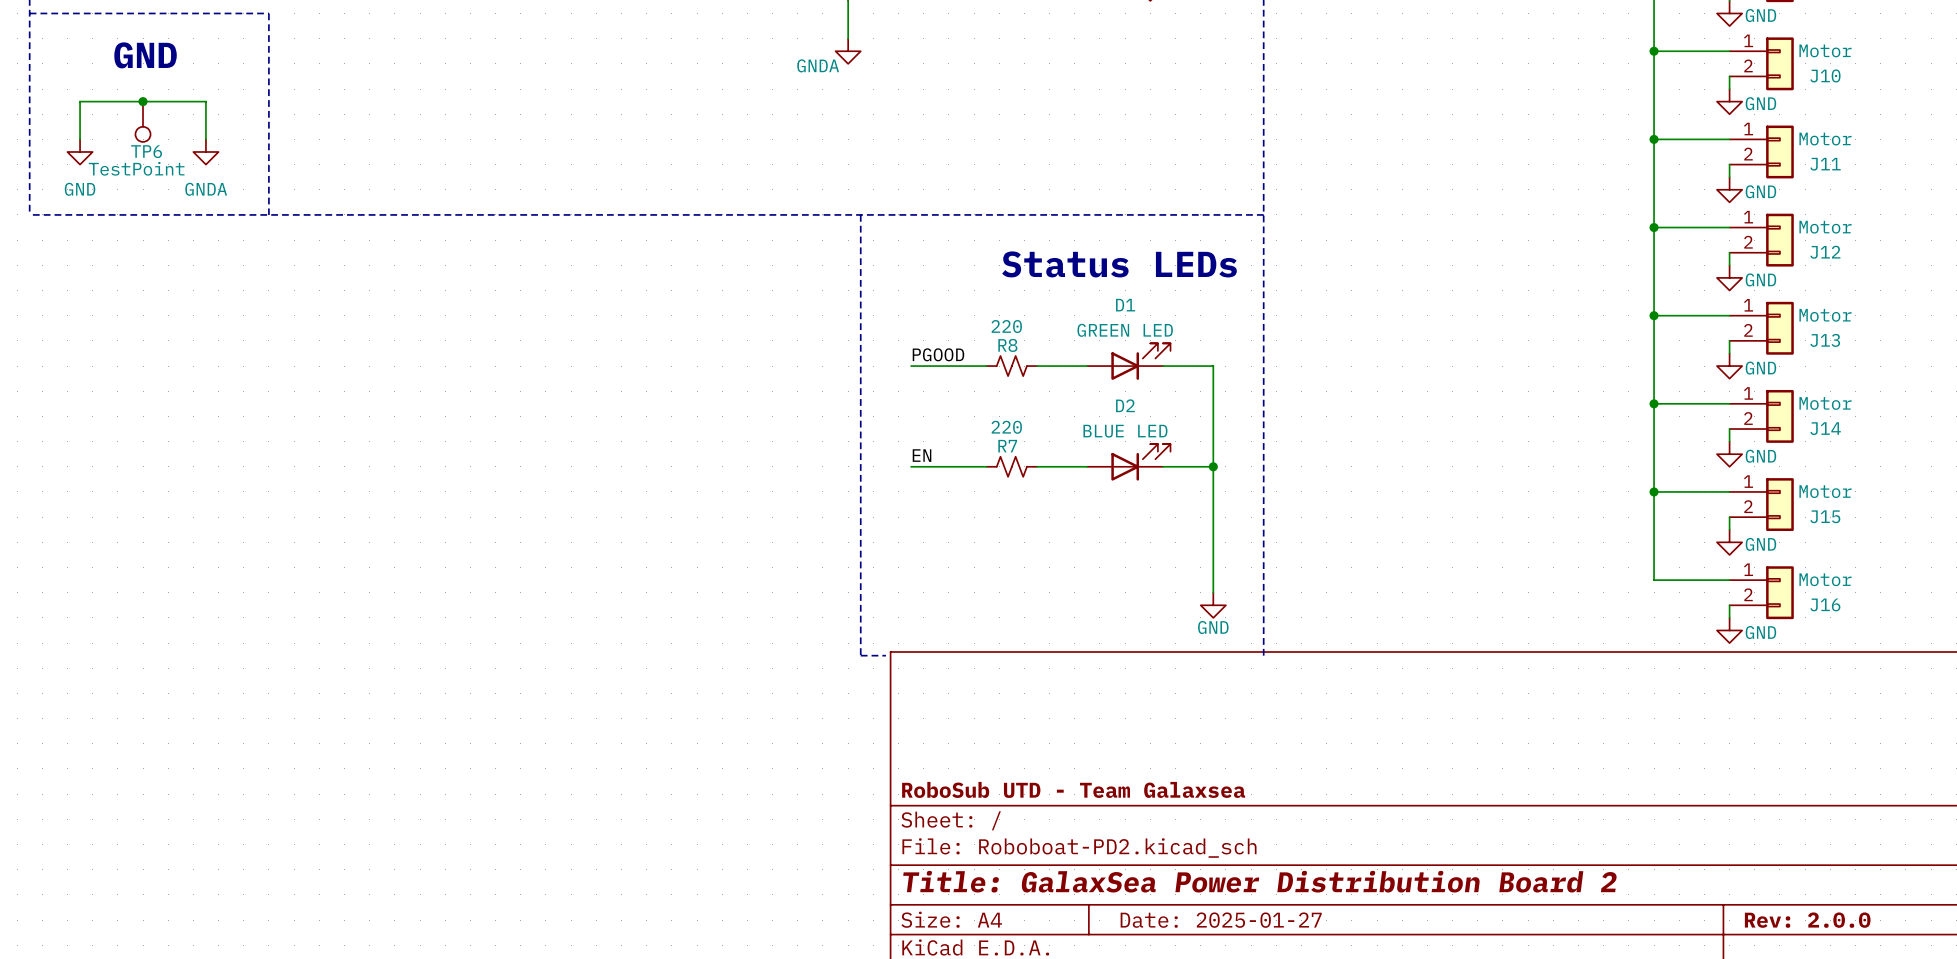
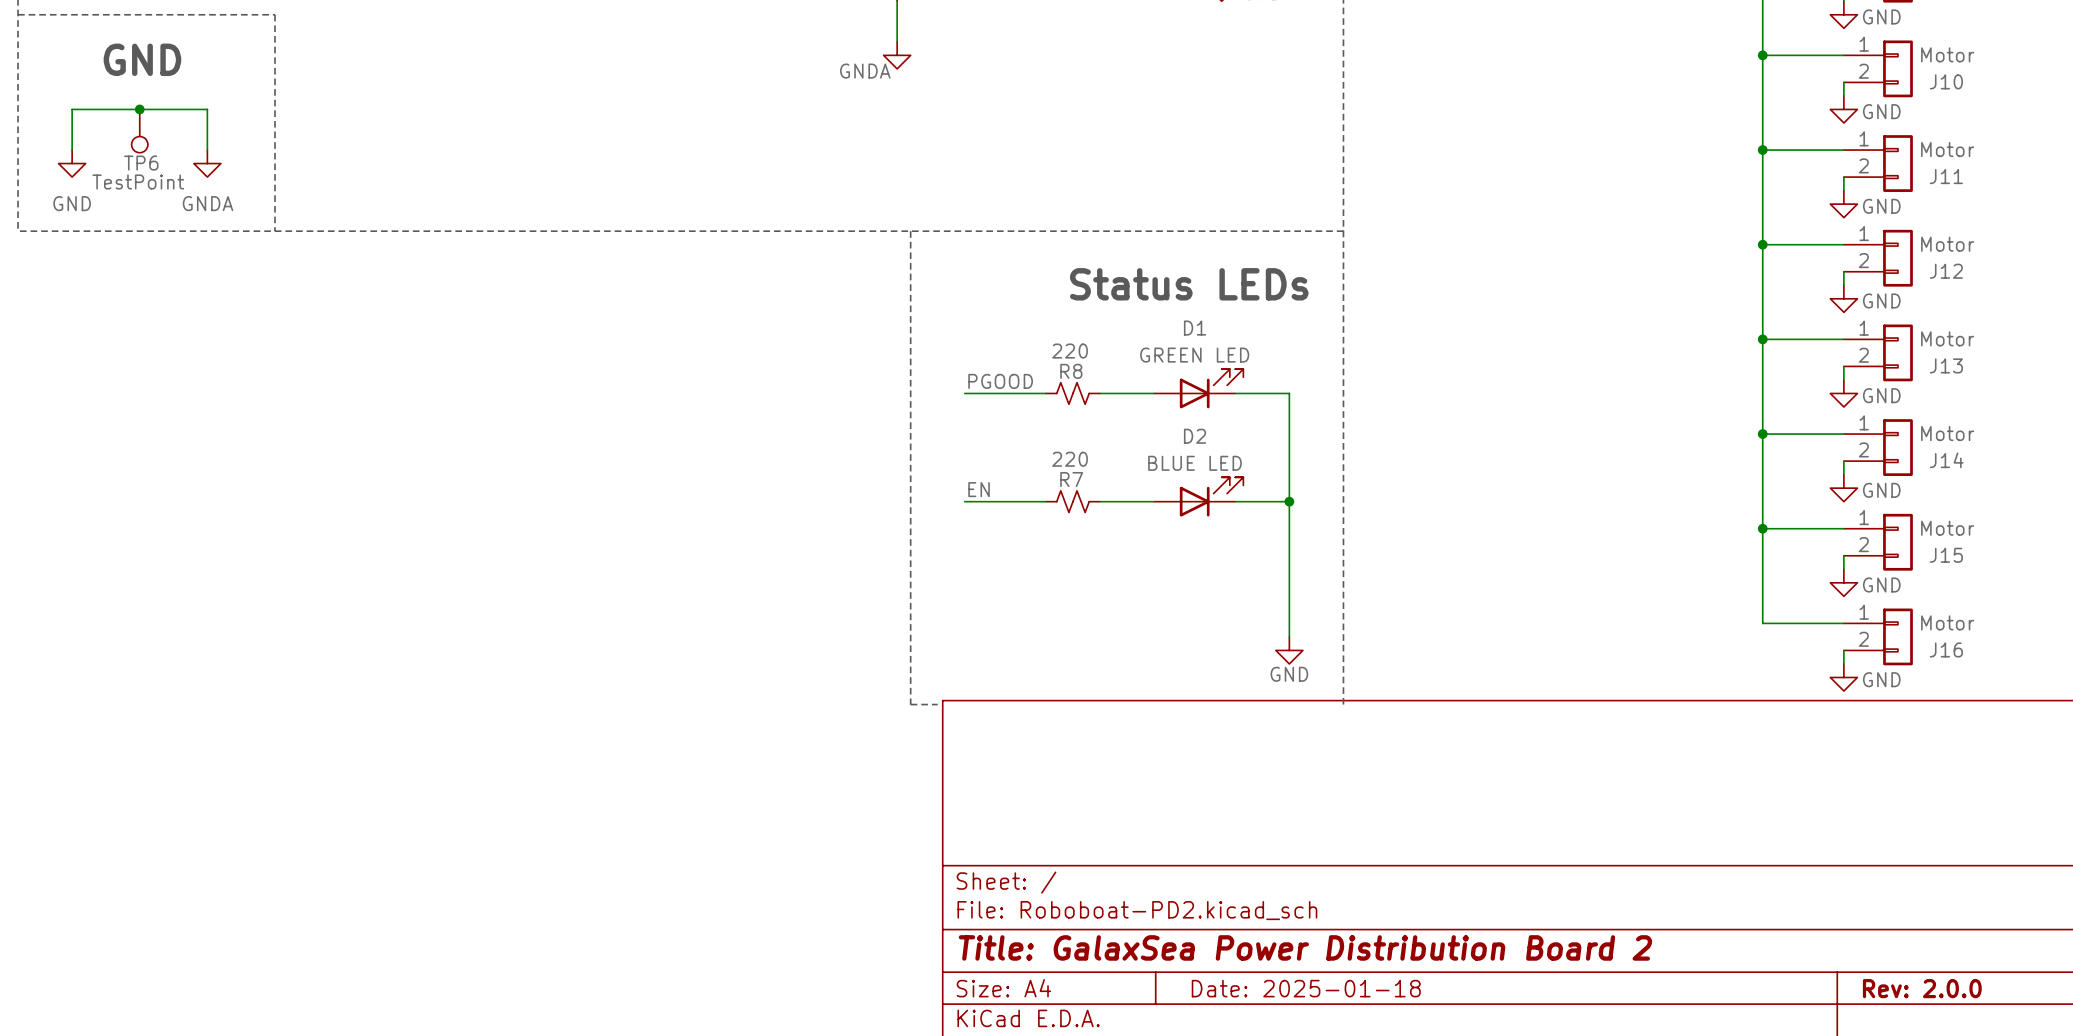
title block: RoboSub UTD - Team Galaxsea (1073, 789) -> none
title block: Date: 2025-01-27 (1221, 920) -> Date: 2025-01-18 (1306, 988)

